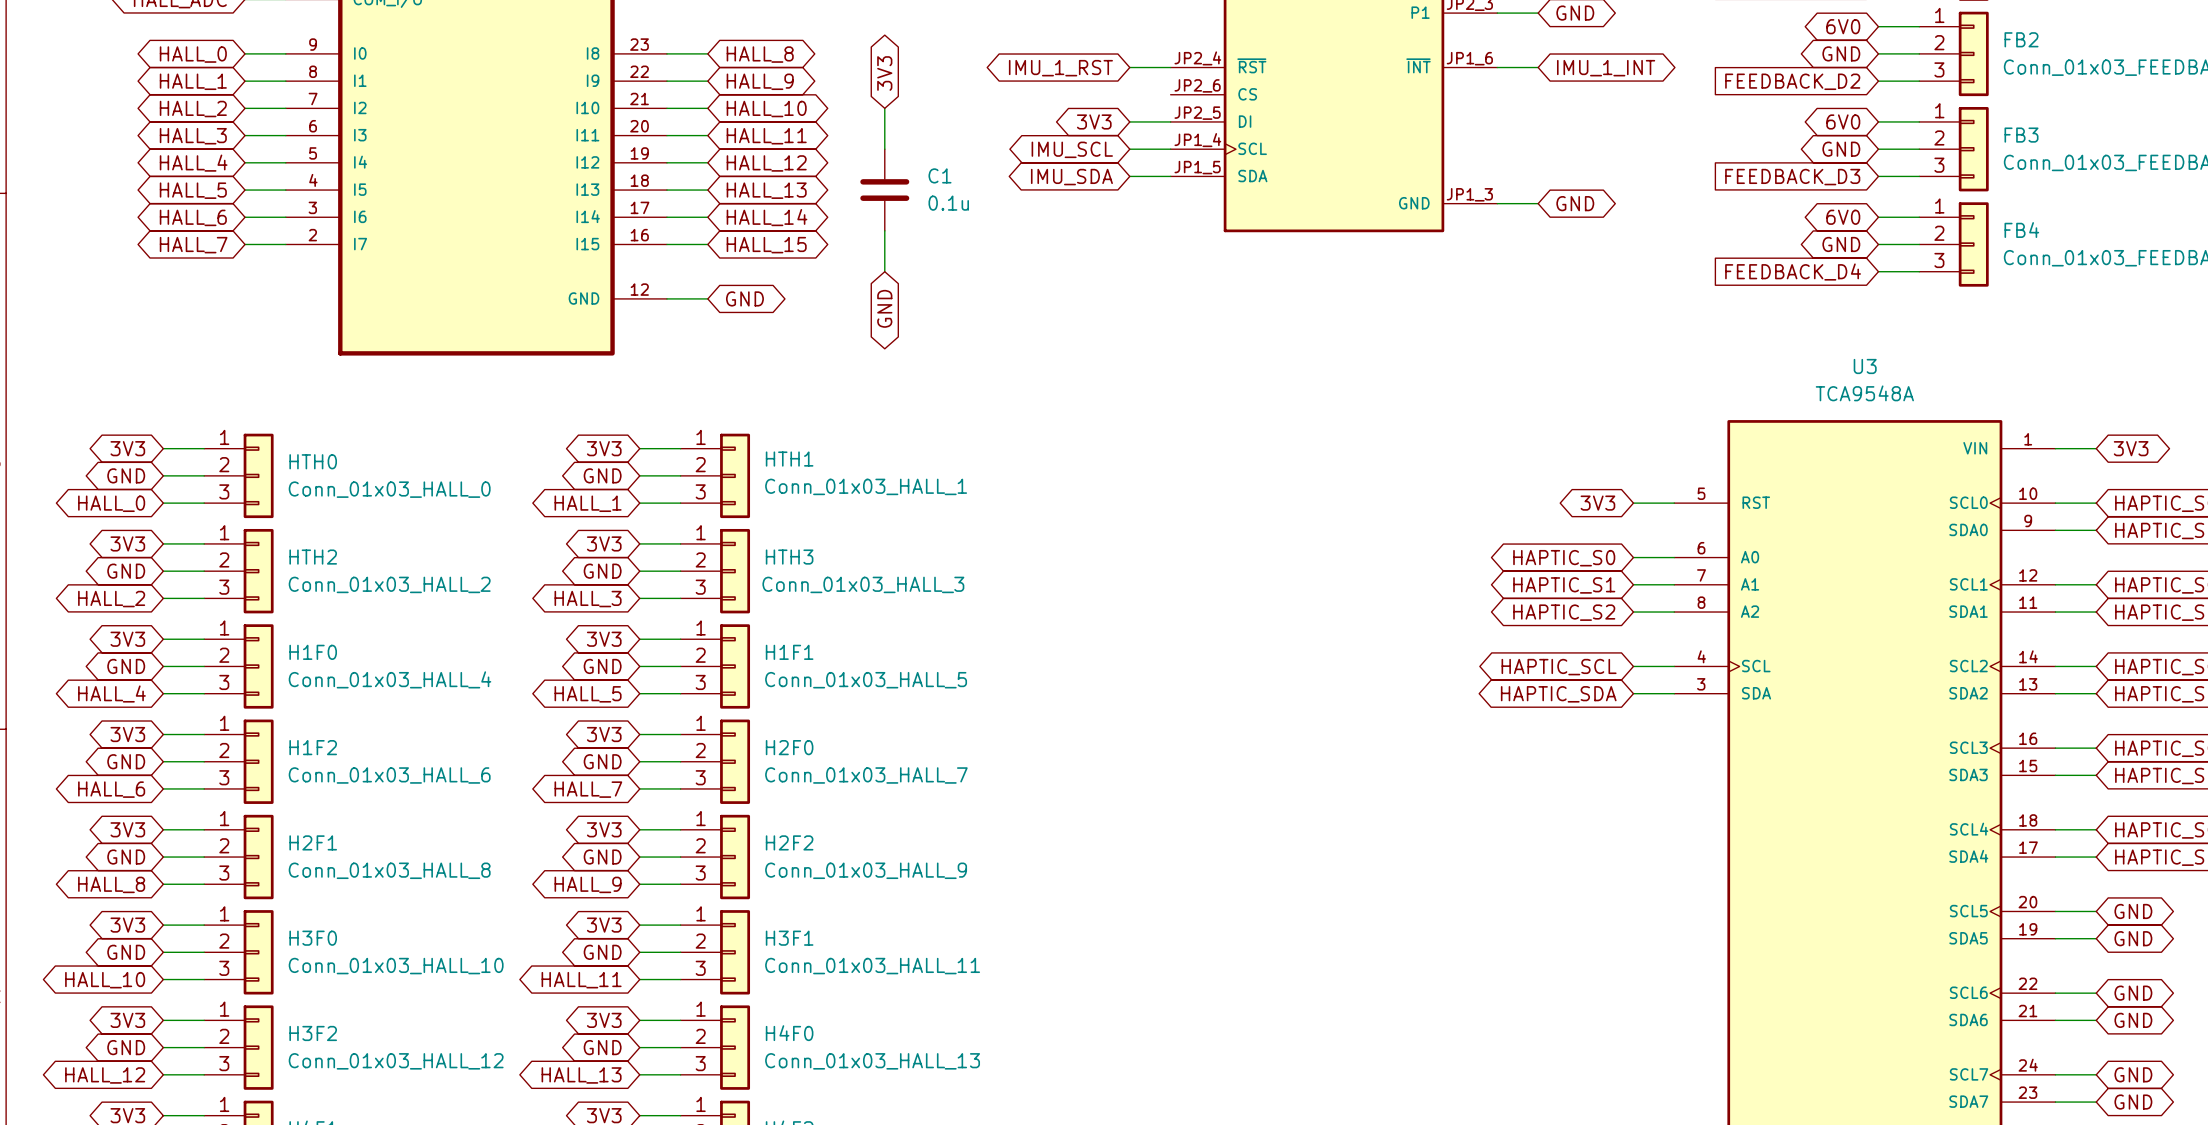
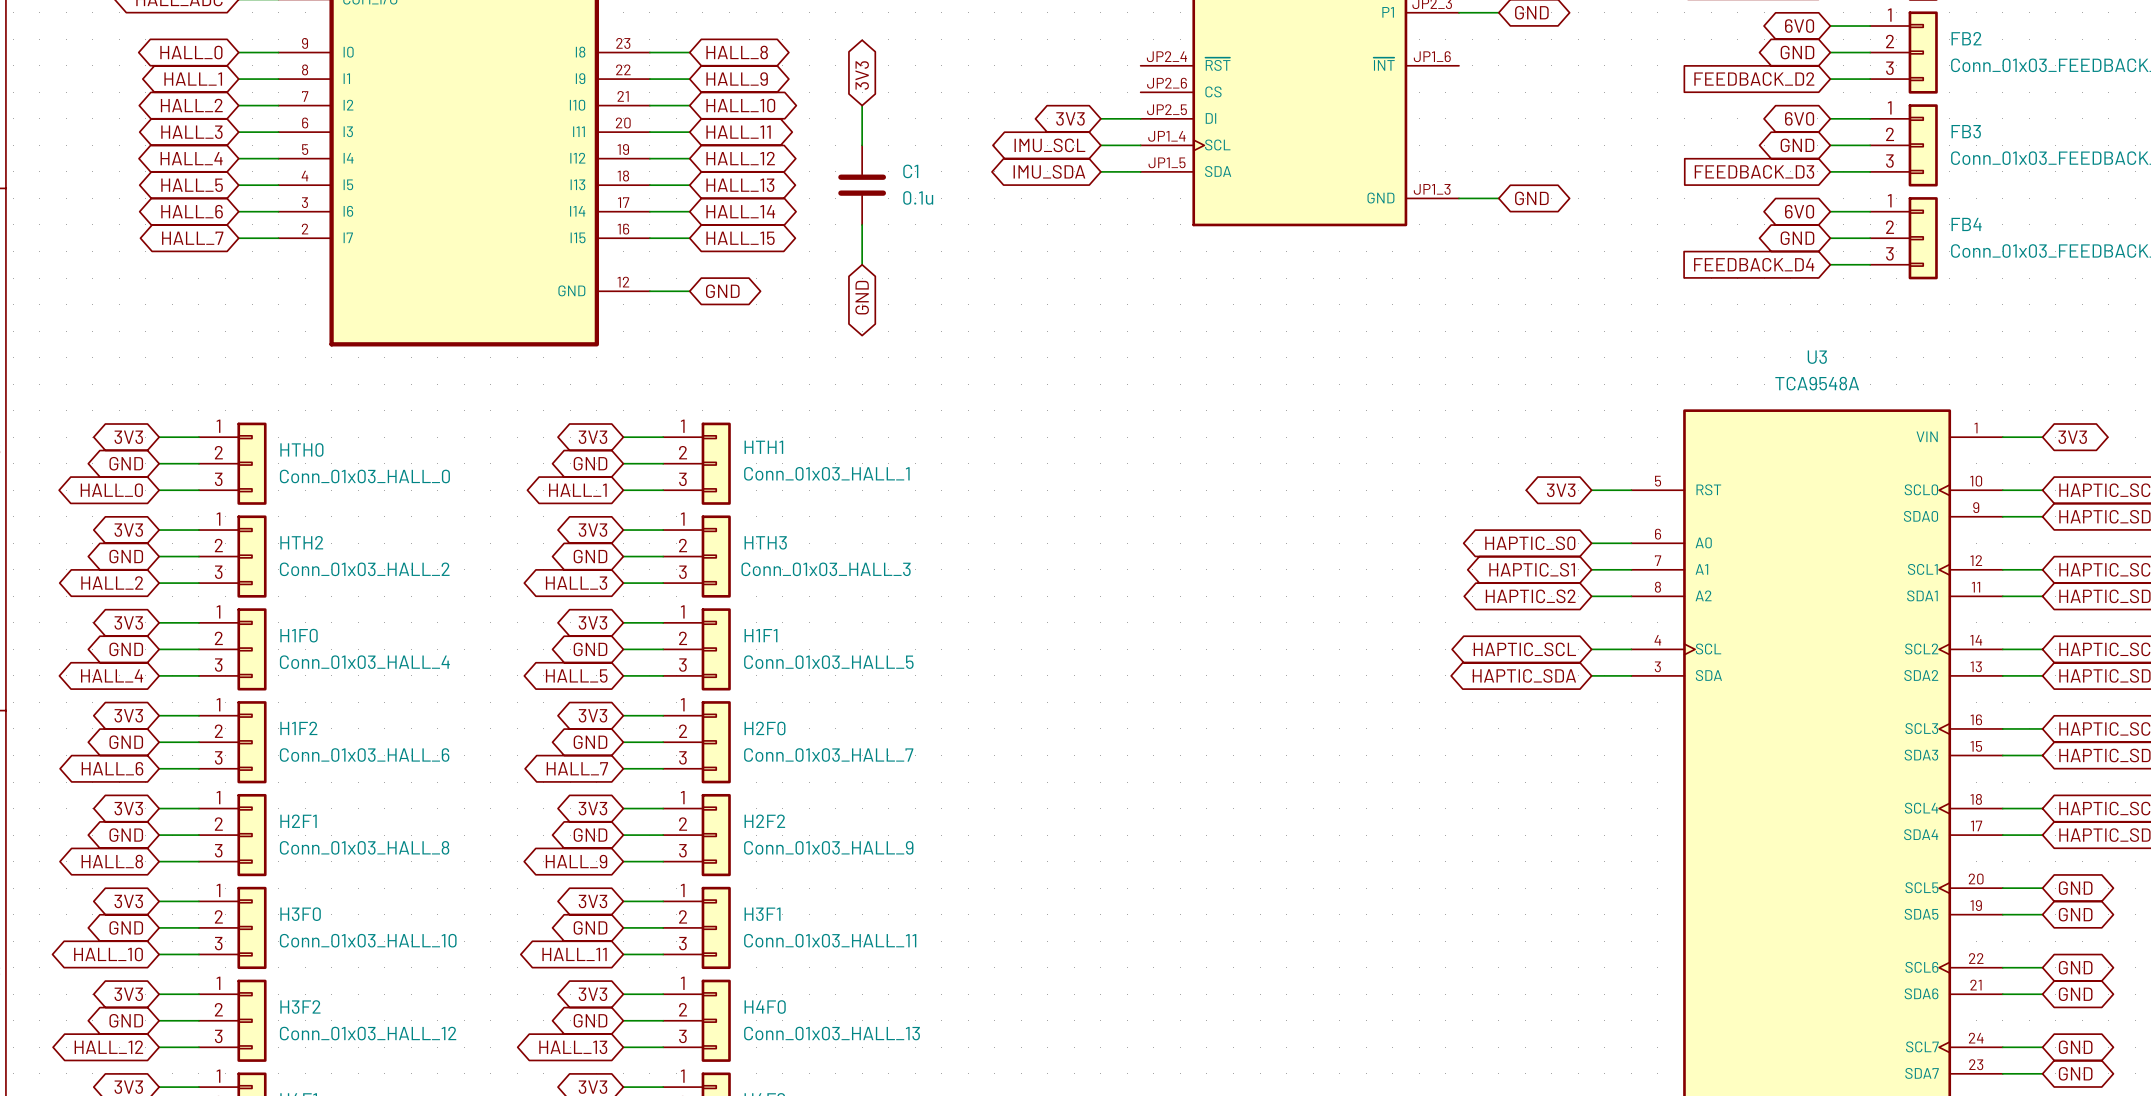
wire: (1129, 67) (1170, 67) -> none
wire: (1497, 67) (1538, 67) -> none
global label: IMU_1_RST (1060, 68) -> none
global label: IMU_1_INT (1606, 68) -> none

